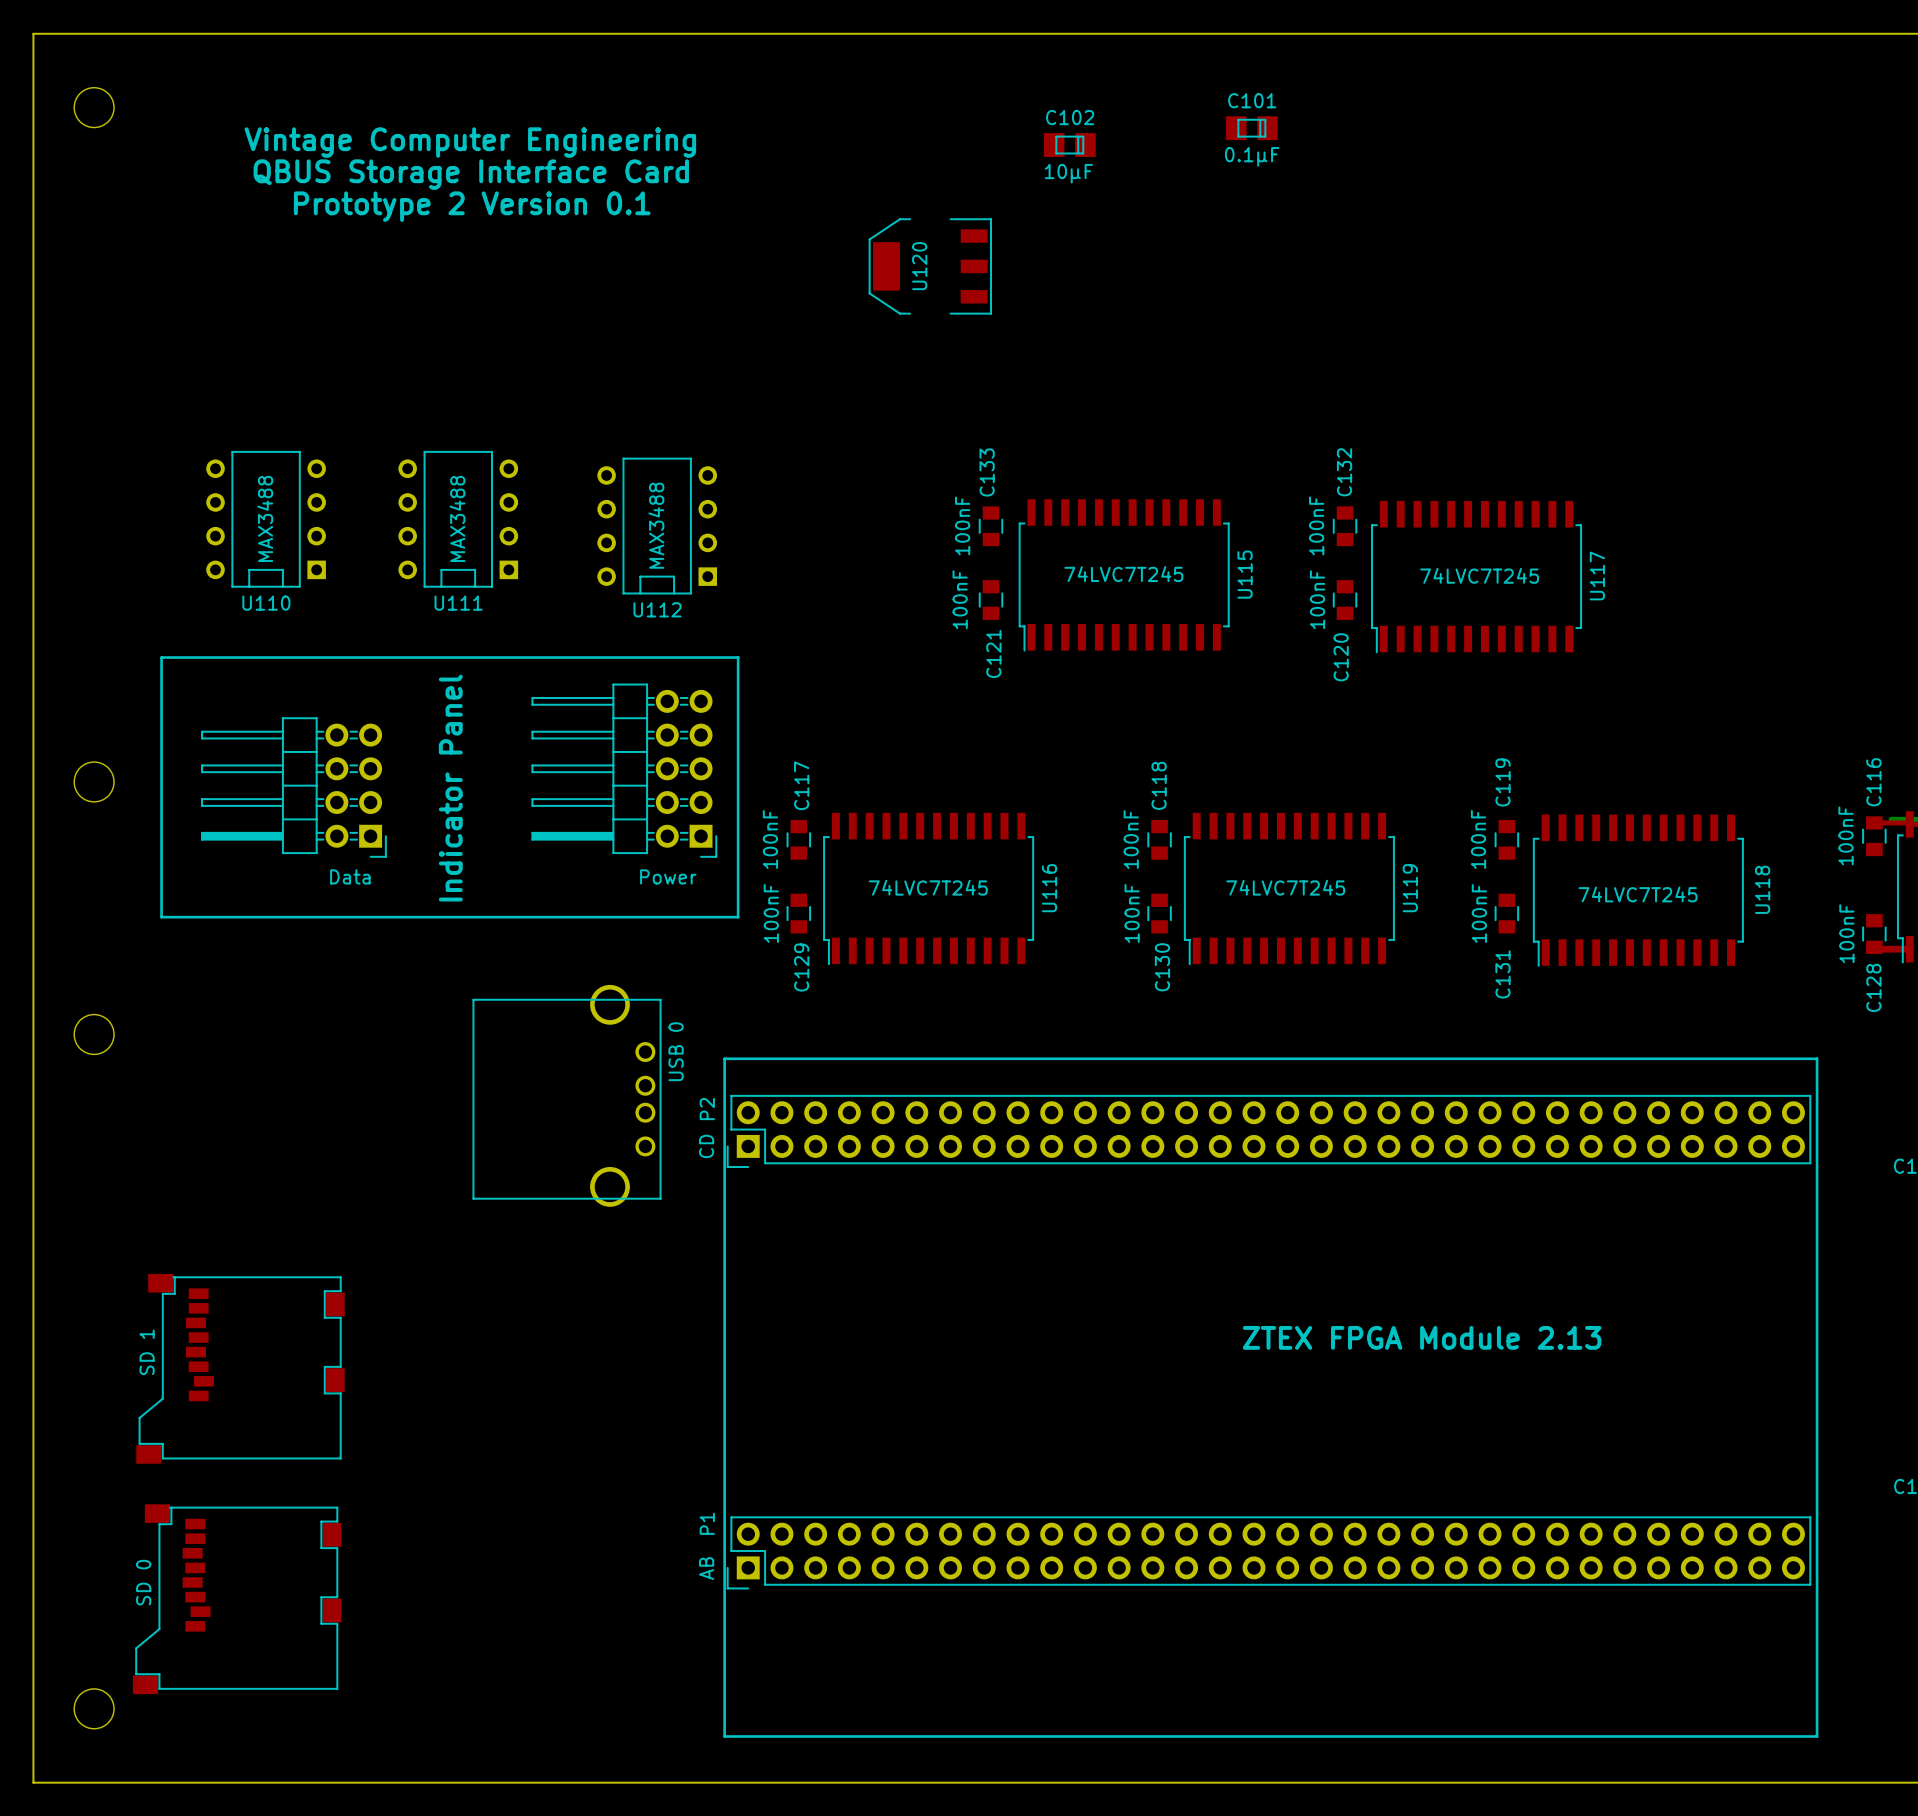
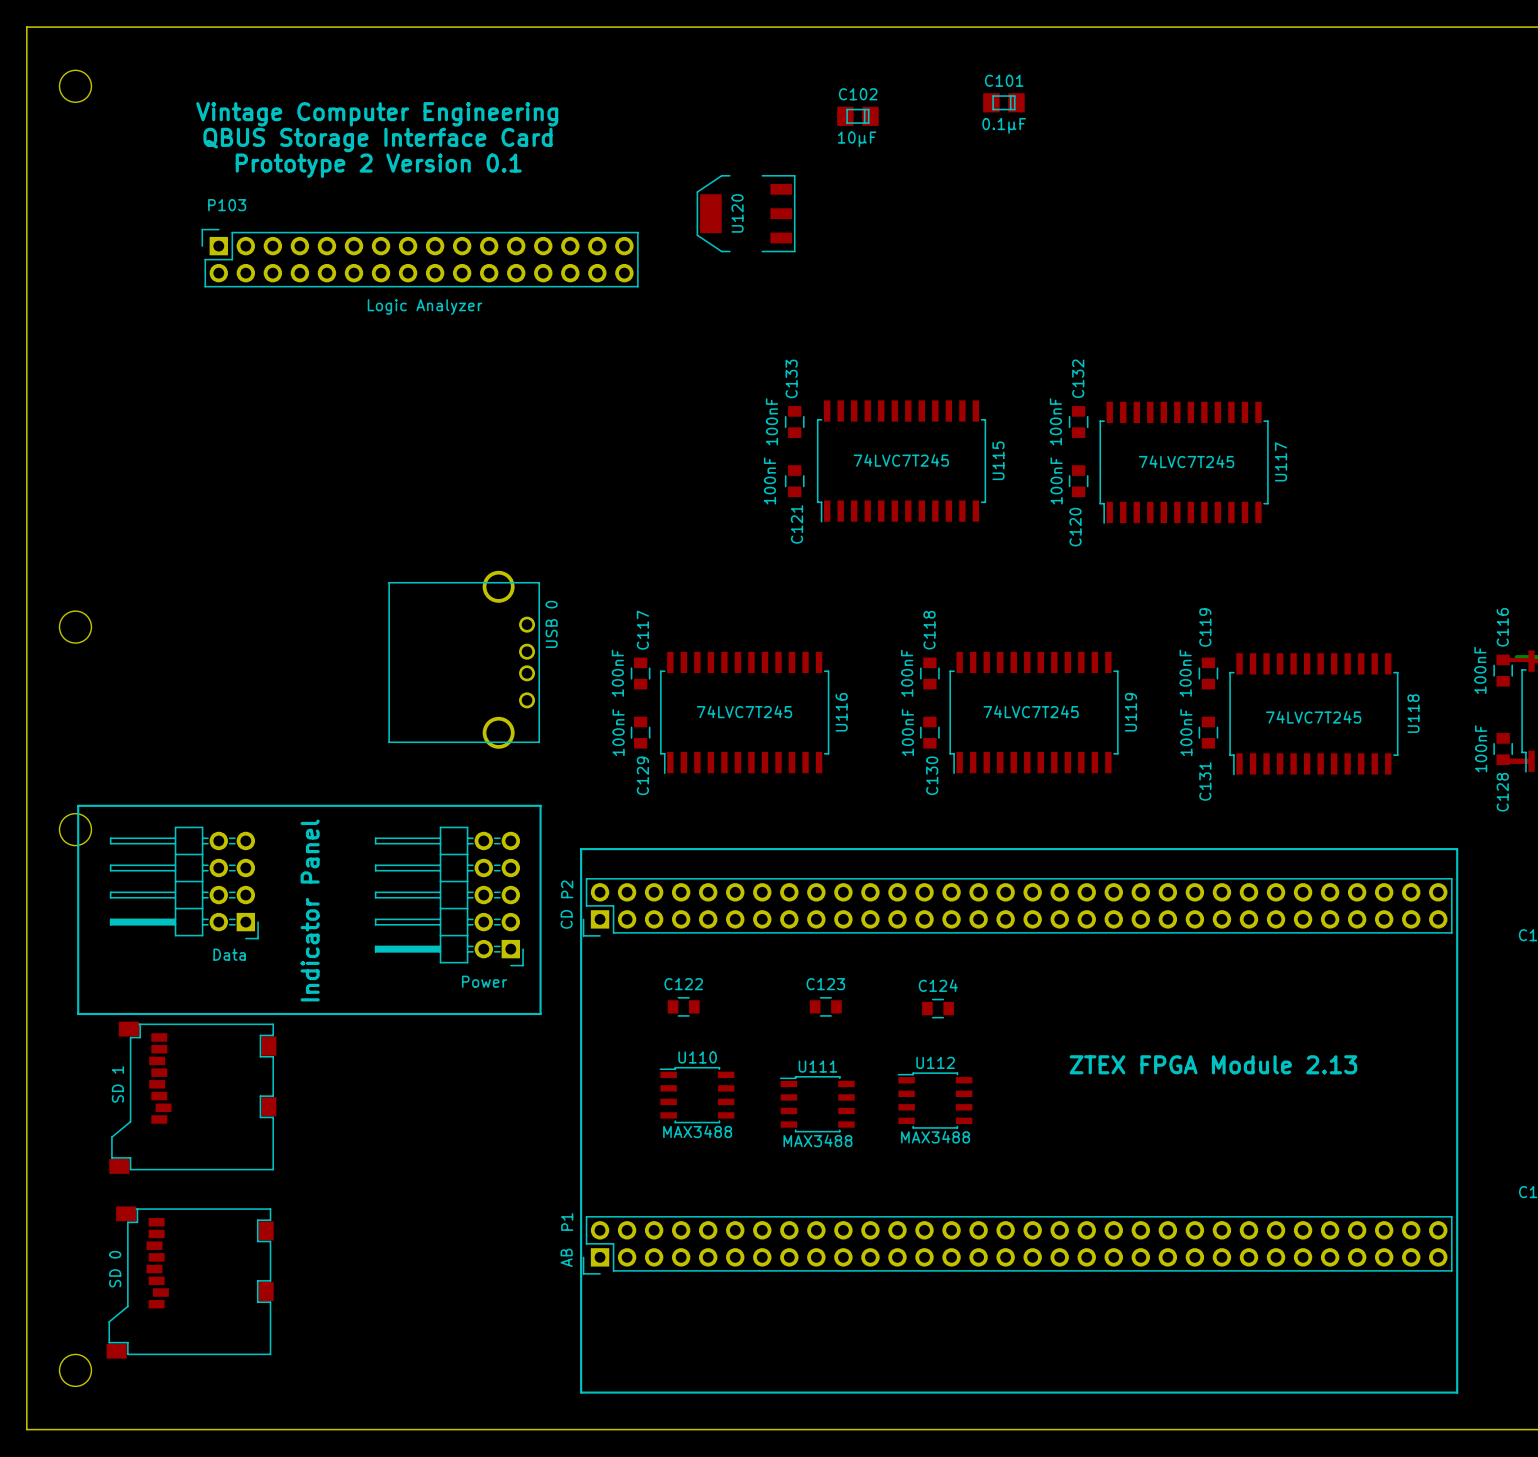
P103: none -> Logic Analyzer (420, 258)
U110 footprint: [206, 450, 326, 588] -> [659, 1066, 735, 1124]
U111 footprint: [398, 450, 519, 588] -> [779, 1076, 855, 1133]
U112 footprint: [597, 457, 718, 595] -> [897, 1072, 973, 1129]
U110 value position: MAX3488 (265, 518) -> MAX3488 (697, 1131)
U111 value position: MAX3488 (457, 518) -> MAX3488 (817, 1140)
U112 value position: MAX3488 (656, 525) -> MAX3488 (935, 1137)
U110 name position: U110 (266, 603) -> U110 (697, 1057)
U111 name position: U111 (458, 603) -> U111 (817, 1066)
U112 name position: U112 (657, 609) -> U112 (935, 1062)
line: (161, 657) (161, 917) (738, 917) (738, 657) (161, 657) -> none
part: Power (624, 770) -> none
part position: (293, 787) -> (184, 883)
text: Indicator Panel (450, 788) -> none
line: none -> (78, 805) (78, 1014) (540, 1014) (540, 805) (78, 805)
USB 0 position: (567, 1095) -> (464, 659)
part: none -> Power (449, 896)
text: none -> Indicator Panel (310, 910)
C122: none -> (683, 1006)
C123: none -> (825, 1006)
C124: none -> (938, 1008)
text position: ZTEX FPGA Module 2.13 (1422, 1337) -> ZTEX FPGA Module 2.13 (1213, 1064)

